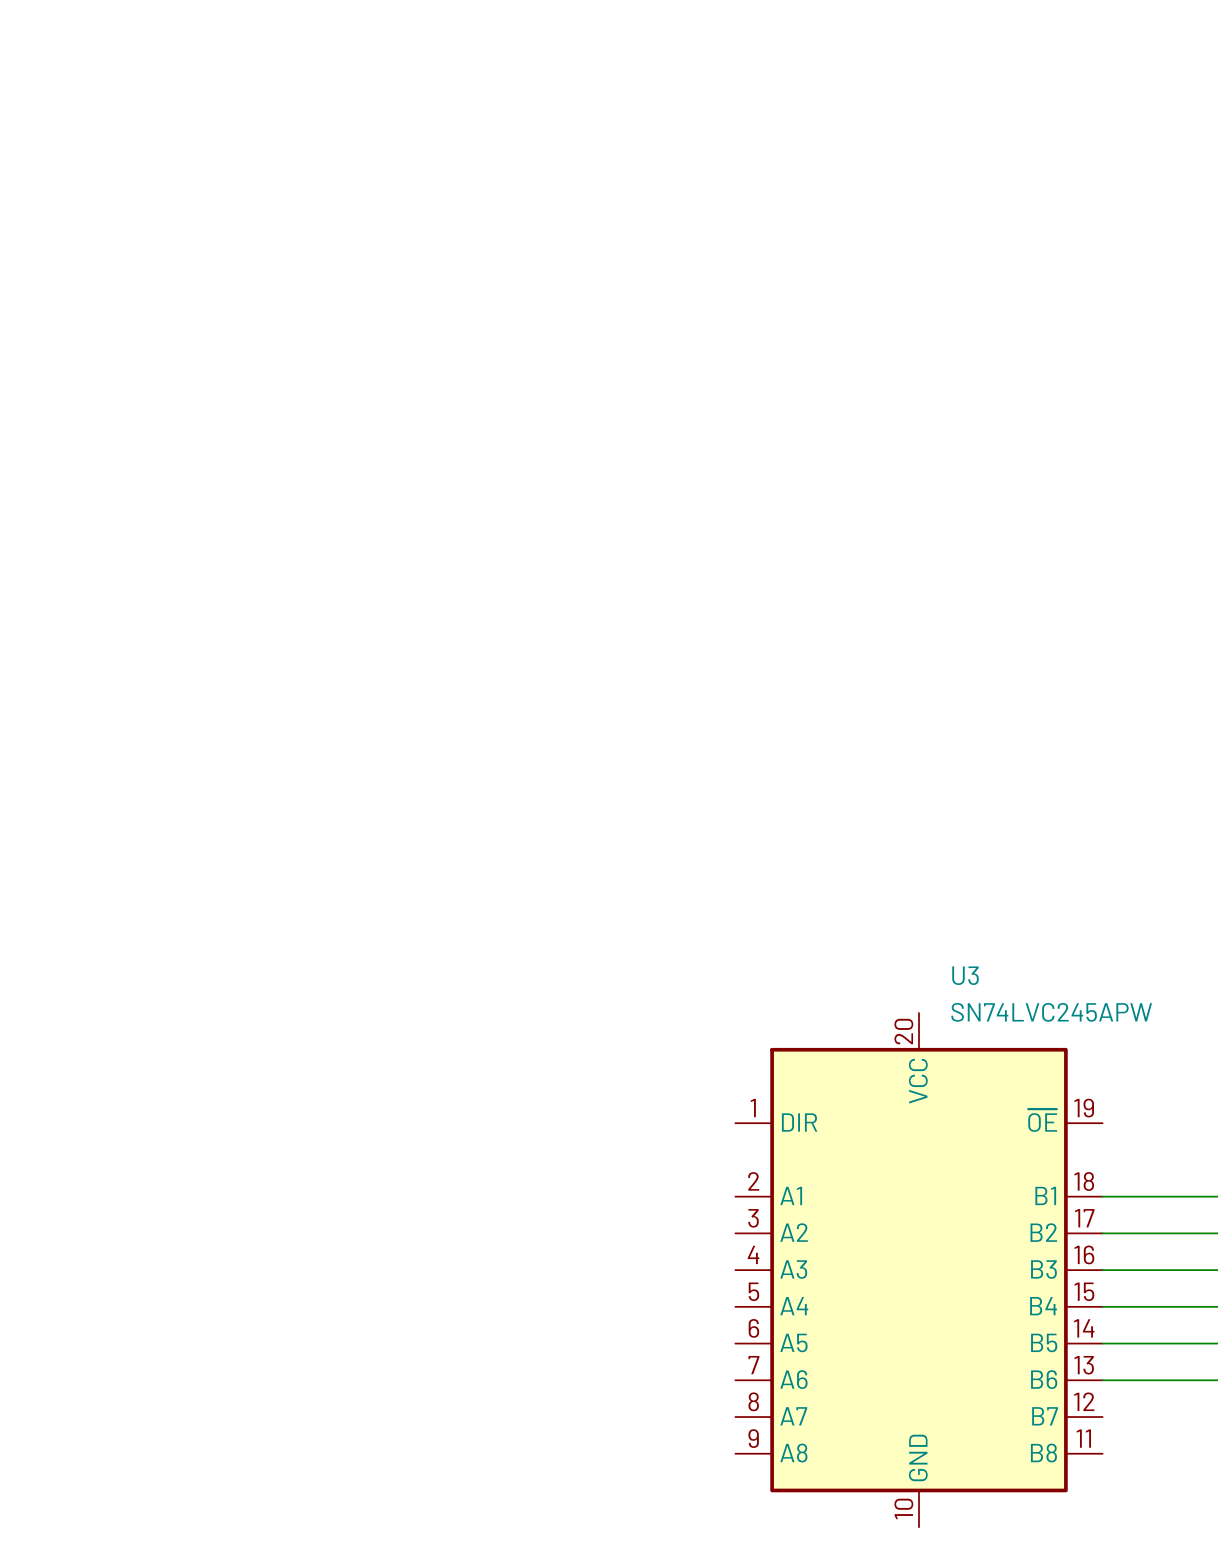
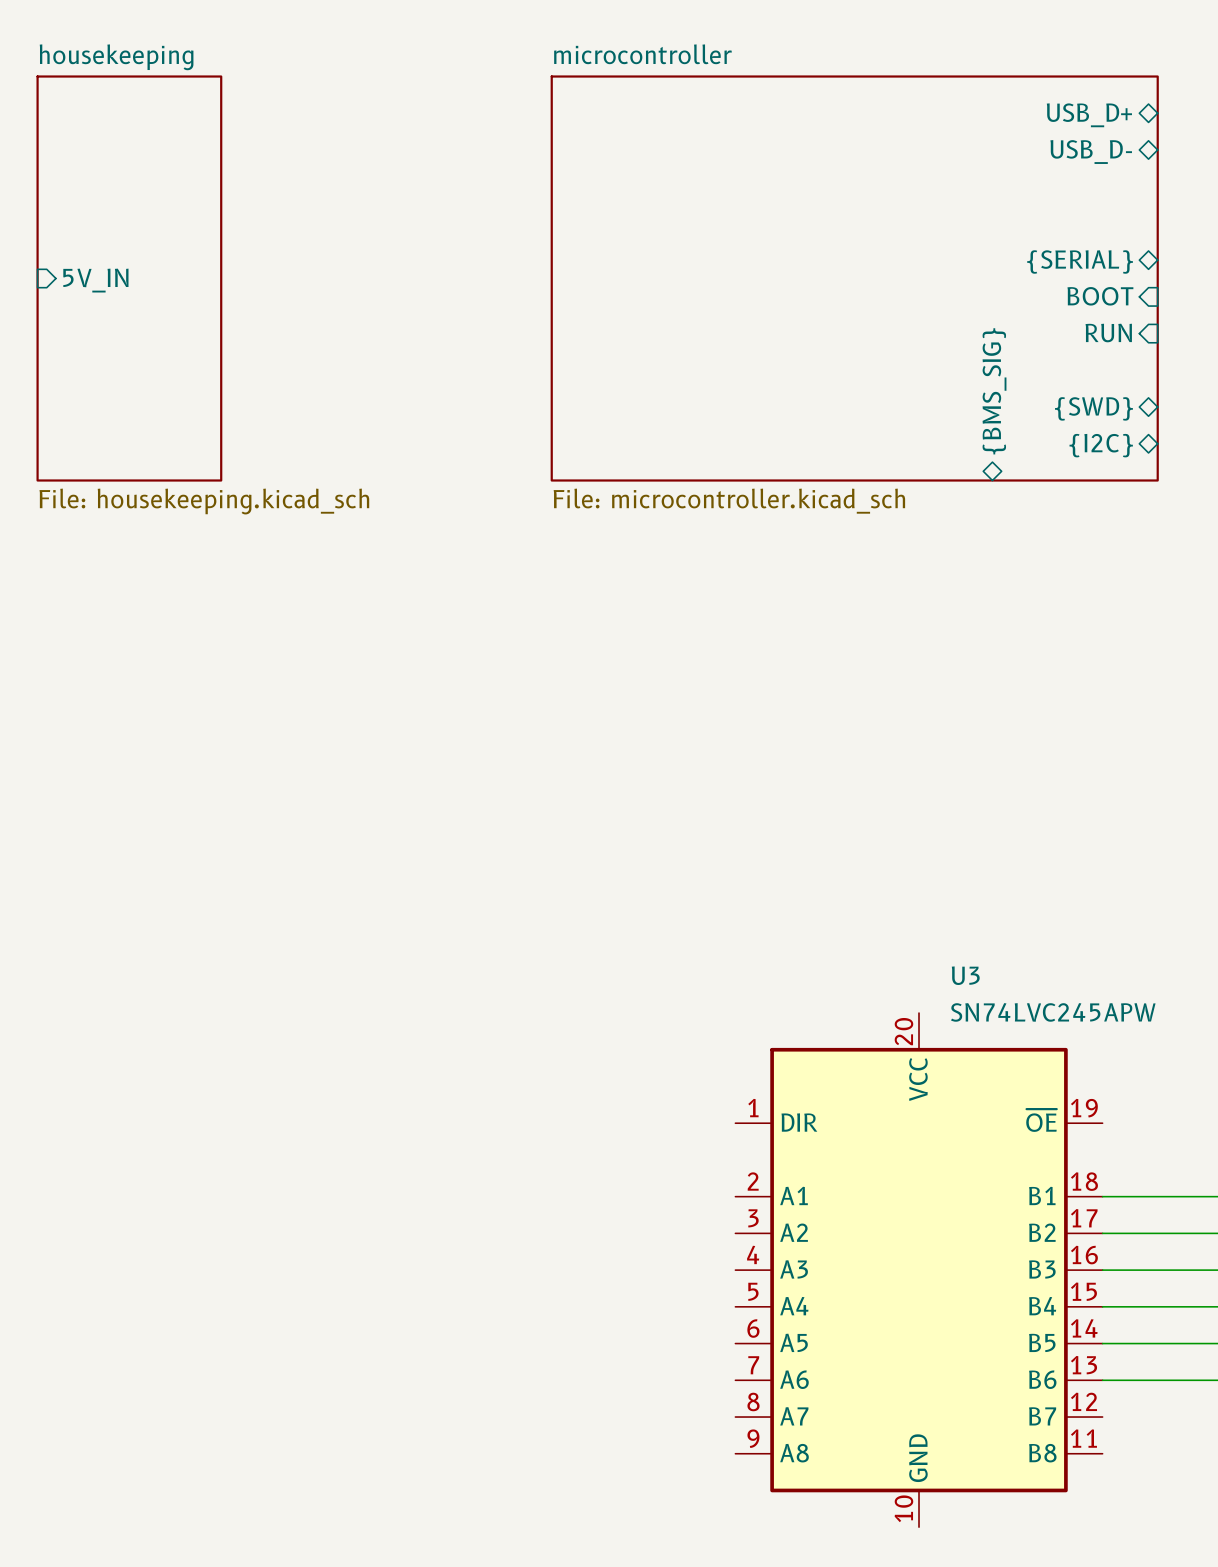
sheet pin: none -> USB_D+ (1089, 115)
sheet pin: none -> USB_D- (1091, 152)
sheet pin: none -> {SERIAL} (1080, 261)
sheet pin: none -> 5V_IN (95, 280)
sheet housekeeping: none -> File: housekeeping.kicad_sch (129, 278)
sheet microcontroller: none -> File: microcontroller.kicad_sch (854, 278)
sheet pin: none -> BOOT (1100, 296)
sheet pin: none -> RUN (1108, 333)
sheet pin: none -> {BMS_SIG} (994, 391)
sheet pin: none -> {SWD} (1093, 408)
sheet pin: none -> {I2C} (1101, 445)

